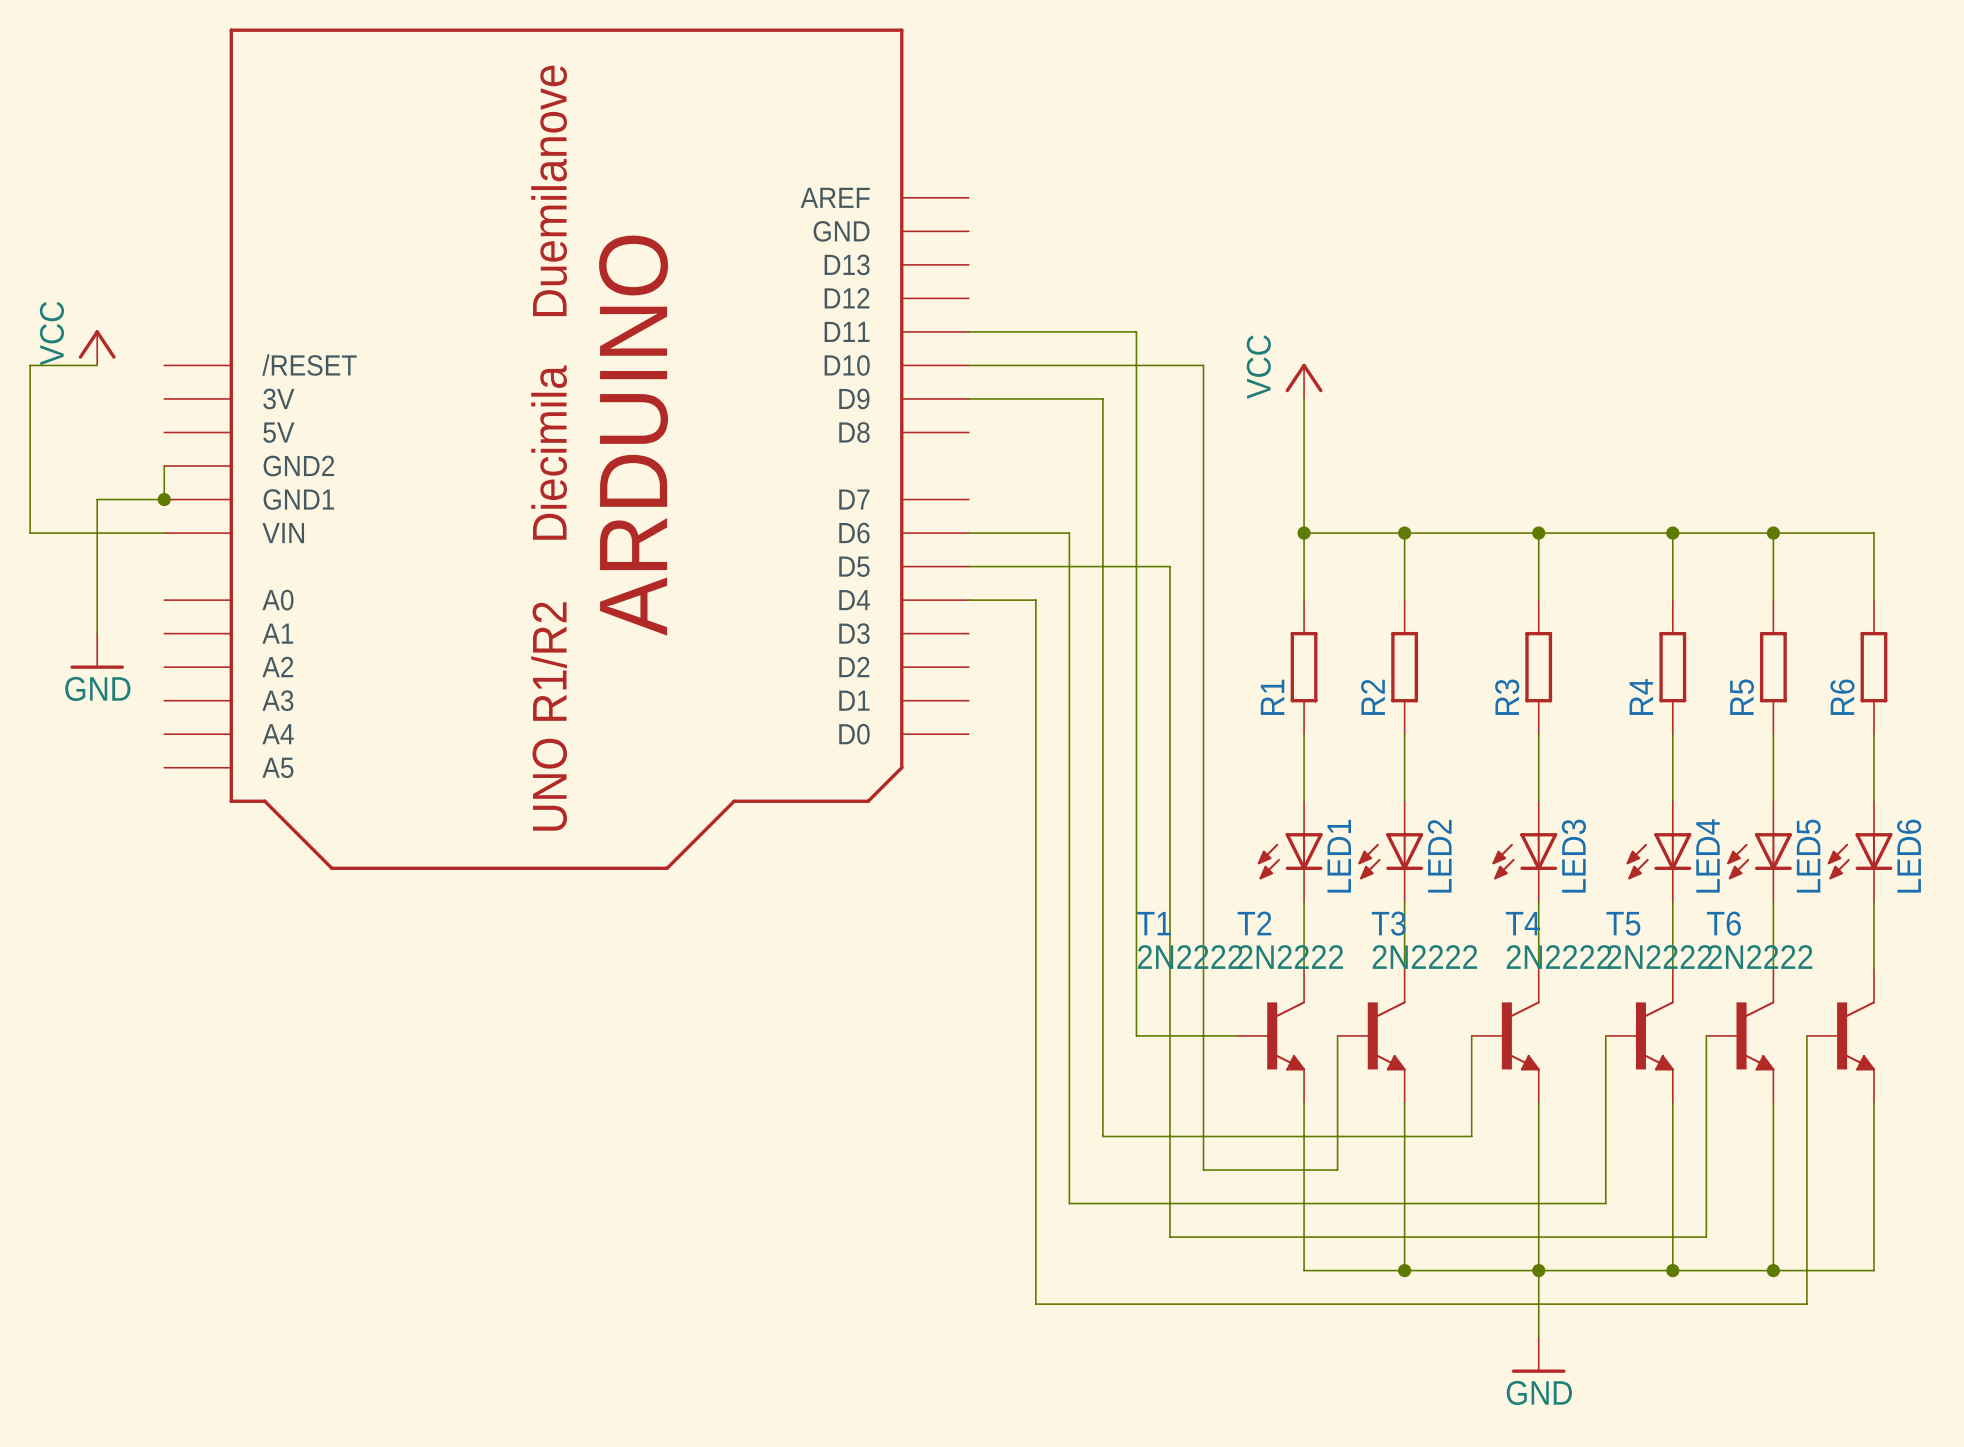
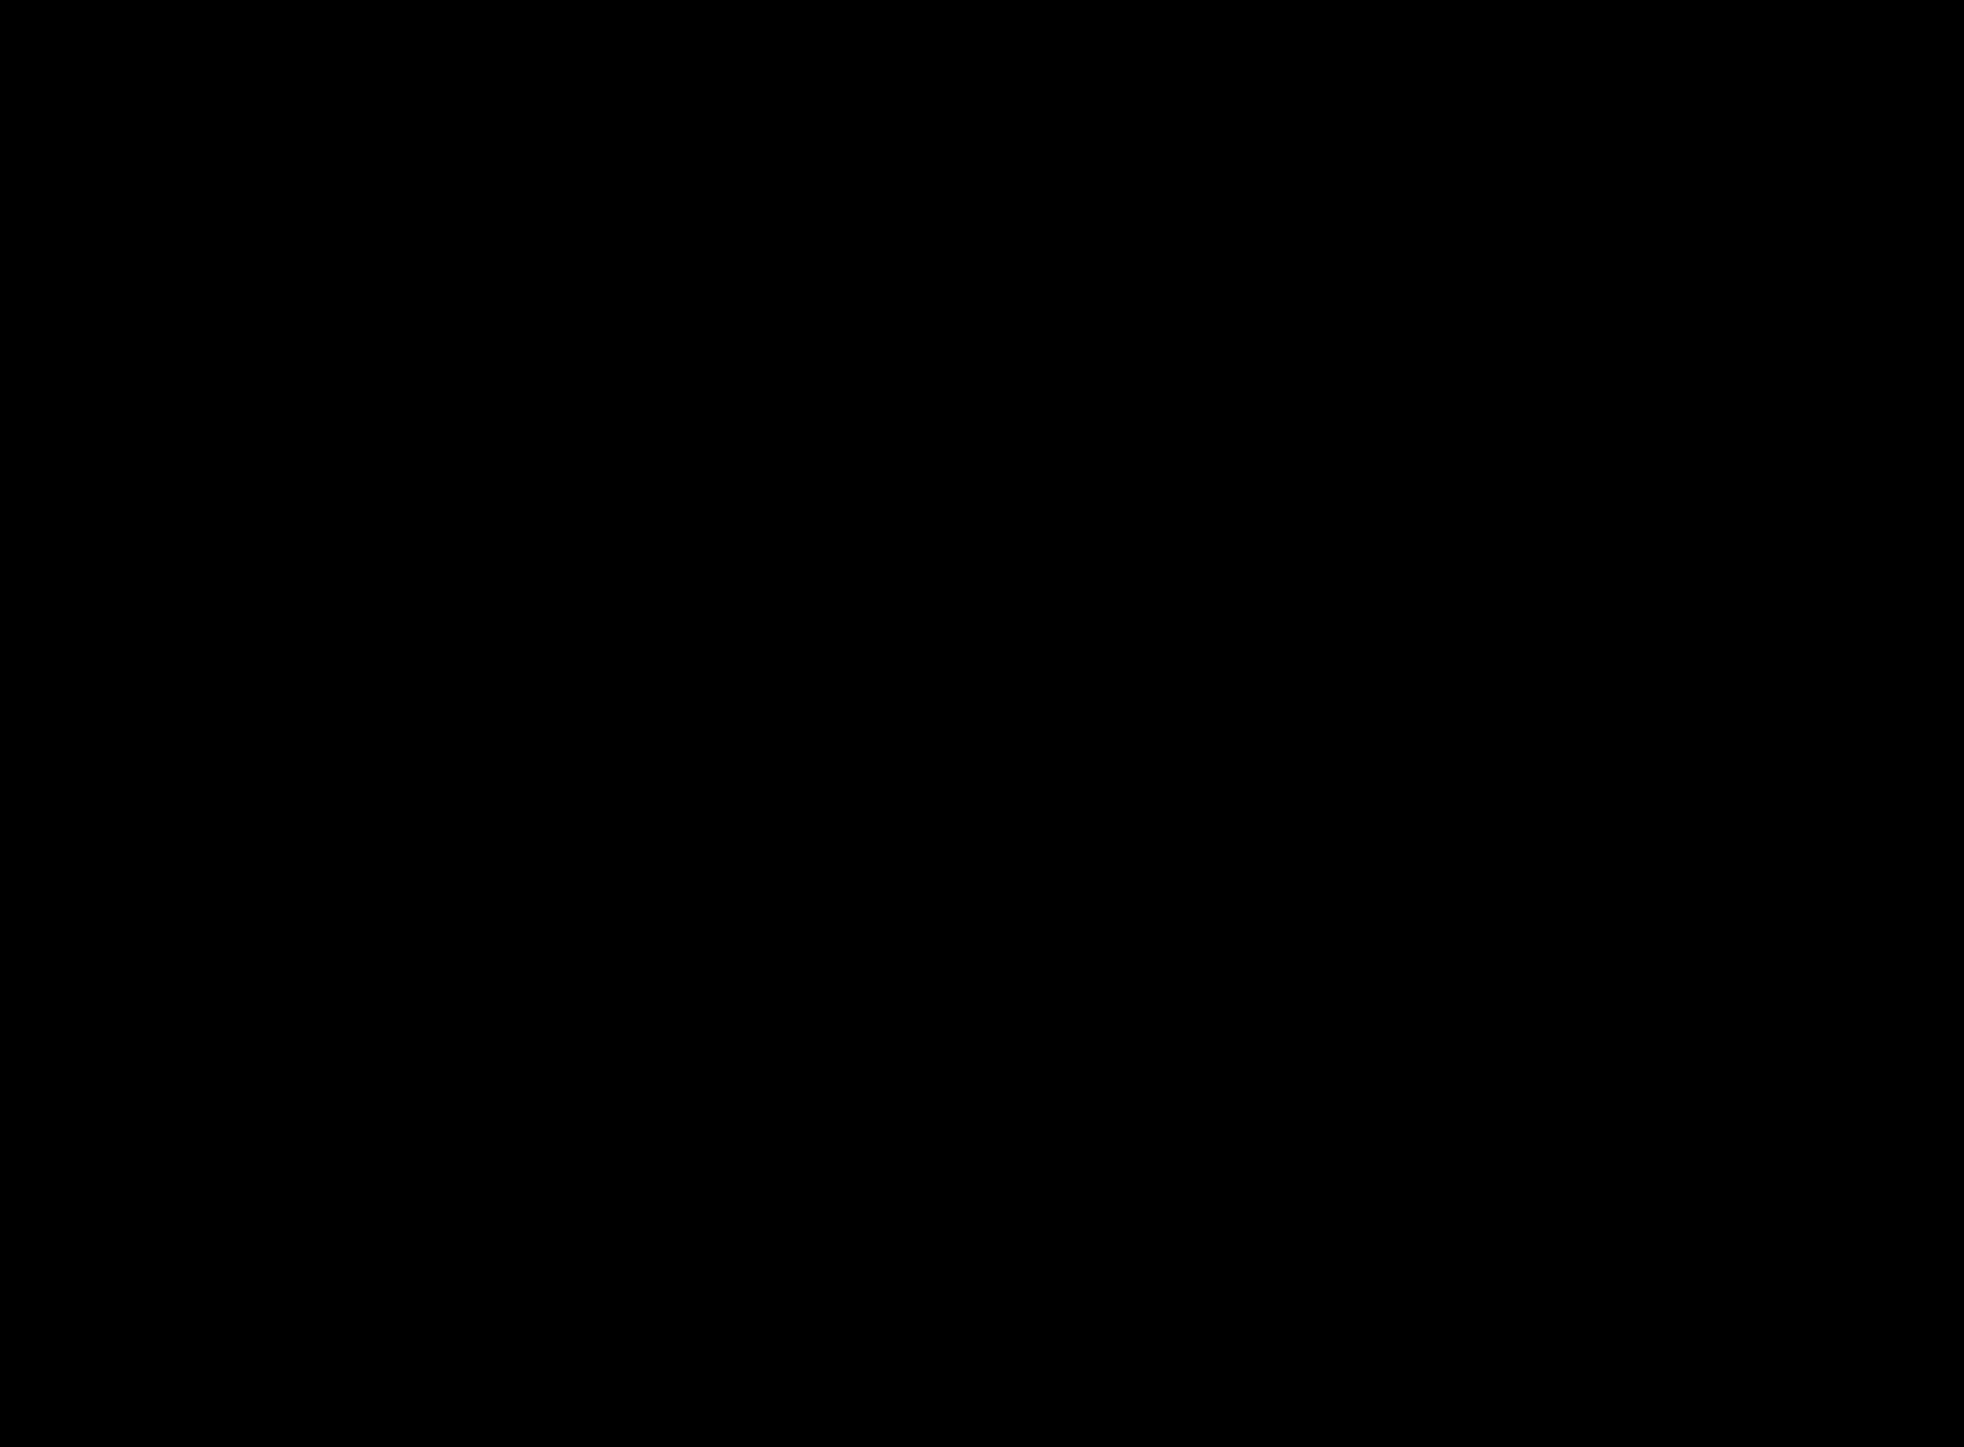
wire: (968, 331) (1136, 331) (1136, 1035) (1237, 1035) -> none
power symbol: VCC (97, 347) -> none
wire: (97, 365) (30, 365) (30, 533) (164, 533) -> none
wire: (968, 365) (1203, 365) (1203, 1170) (1337, 1170) (1337, 1035) -> none
power symbol: VCC (1304, 381) -> none
wire: (968, 398) (1102, 398) (1102, 1136) (1471, 1136) (1471, 1035) -> none
wire: (1304, 398) (1304, 600) -> none
part: (566, 449) -> none
wire: (164, 466) (164, 499) (97, 499) (97, 633) -> none
junction: (164, 499) -> none
wire: (968, 533) (1069, 533) (1069, 1203) (1605, 1203) (1605, 1035) -> none
wire: (1304, 533) (1873, 533) (1873, 600) -> none
junction: (1304, 533) -> none
wire: (1404, 533) (1404, 600) -> none
junction: (1404, 533) -> none
wire: (1538, 533) (1538, 600) -> none
junction: (1538, 533) -> none
wire: (1672, 533) (1672, 600) -> none
junction: (1672, 533) -> none
wire: (1773, 533) (1773, 600) -> none
junction: (1773, 533) -> none
wire: (968, 566) (1169, 566) (1169, 1237) (1706, 1237) (1706, 1035) -> none
wire: (968, 600) (1035, 600) (1035, 1304) (1806, 1304) (1806, 1035) -> none
power symbol: GND (97, 651) -> none
R1: (1304, 667) -> none
R2: (1404, 667) -> none
R3: (1538, 667) -> none
R4: (1672, 667) -> none
R5: (1773, 667) -> none
R6: (1873, 667) -> none
wire: (1304, 734) (1304, 801) -> none
wire: (1404, 734) (1404, 801) -> none
wire: (1538, 734) (1538, 801) -> none
wire: (1672, 734) (1672, 801) -> none
wire: (1773, 734) (1773, 801) -> none
wire: (1873, 734) (1873, 801) -> none
LED1: (1290, 851) -> none
LED2: (1390, 851) -> none
LED3: (1524, 851) -> none
LED4: (1658, 851) -> none
LED5: (1759, 851) -> none
LED6: (1860, 851) -> none
wire: (1304, 901) (1304, 968) -> none
wire: (1404, 901) (1404, 968) -> none
wire: (1538, 901) (1538, 968) -> none
wire: (1672, 901) (1672, 968) -> none
wire: (1773, 901) (1773, 968) -> none
wire: (1873, 901) (1873, 968) -> none
T1: 2N2222 (1271, 1035) -> none
T2: 2N2222 (1371, 1035) -> none
T3: 2N2222 (1505, 1035) -> none
T4: 2N2222 (1639, 1035) -> none
T5: 2N2222 (1740, 1035) -> none
T6: 2N2222 (1840, 1035) -> none
wire: (1304, 1102) (1304, 1270) (1873, 1270) (1873, 1102) -> none
wire: (1404, 1102) (1404, 1270) -> none
wire: (1538, 1102) (1538, 1337) -> none
wire: (1672, 1102) (1672, 1270) -> none
wire: (1773, 1102) (1773, 1270) -> none
junction: (1404, 1270) -> none
junction: (1538, 1270) -> none
junction: (1672, 1270) -> none
junction: (1773, 1270) -> none
power symbol: GND (1538, 1355) -> none

